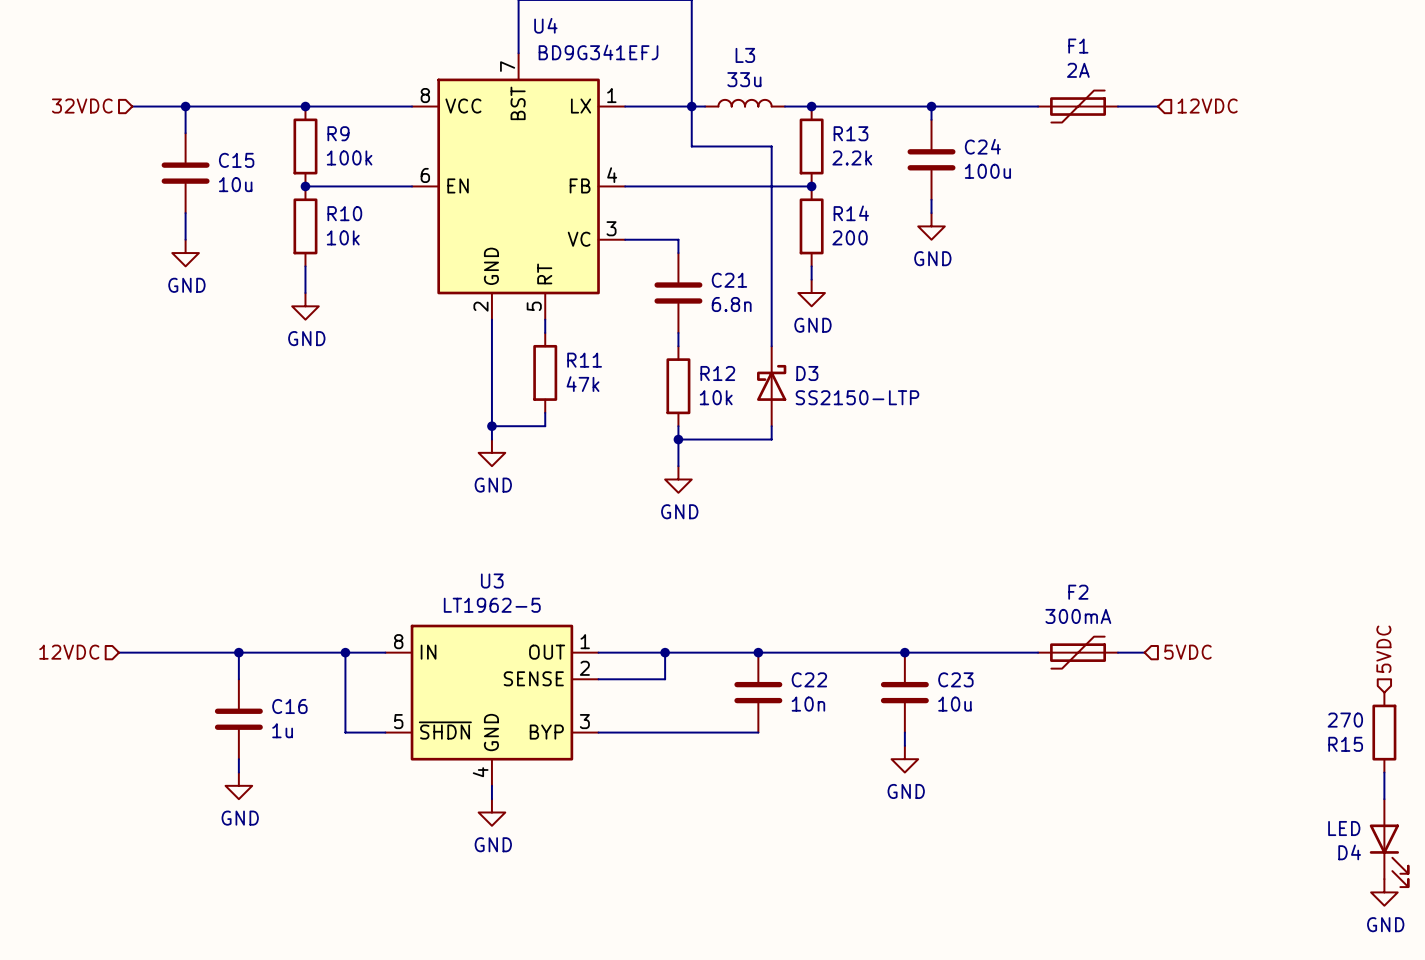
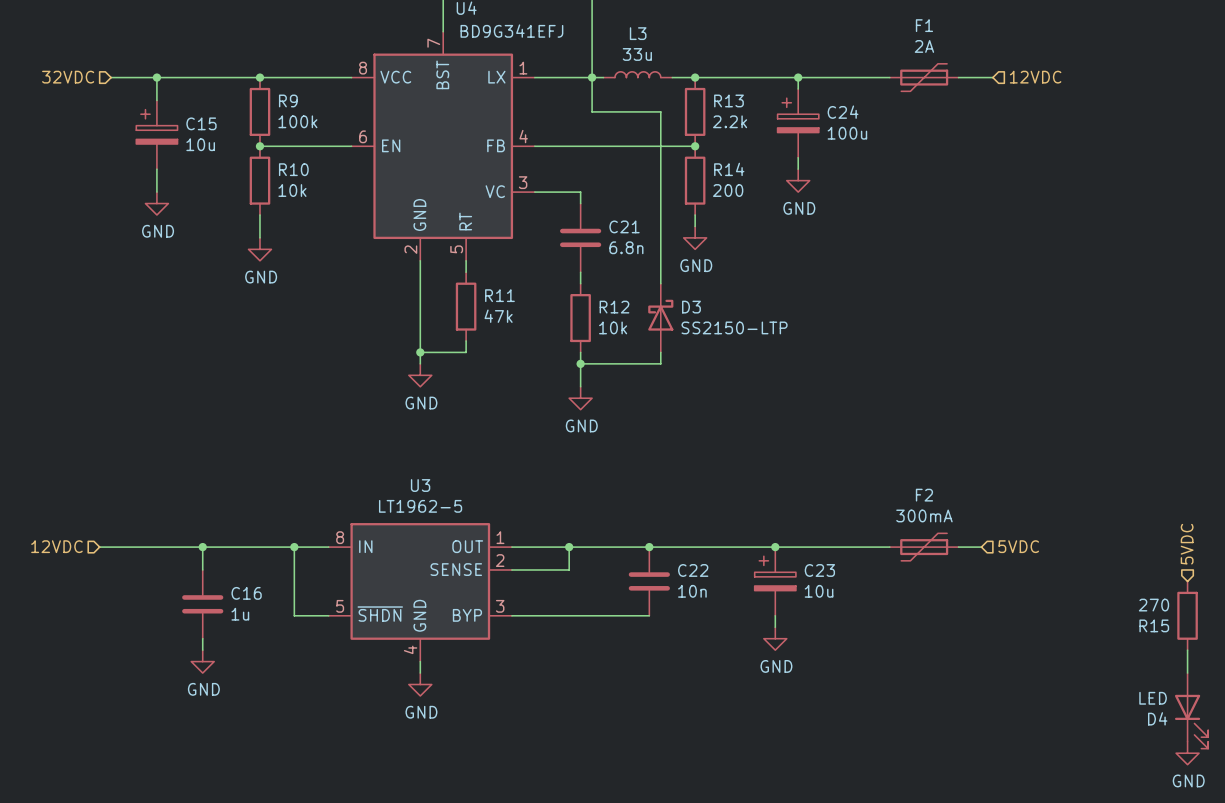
C24 symbol: [907, 119, 956, 200] -> [777, 89, 819, 158]
C15 symbol: [161, 133, 210, 214] -> [136, 100, 178, 170]
C23 symbol: [880, 652, 929, 733] -> [754, 547, 796, 616]

